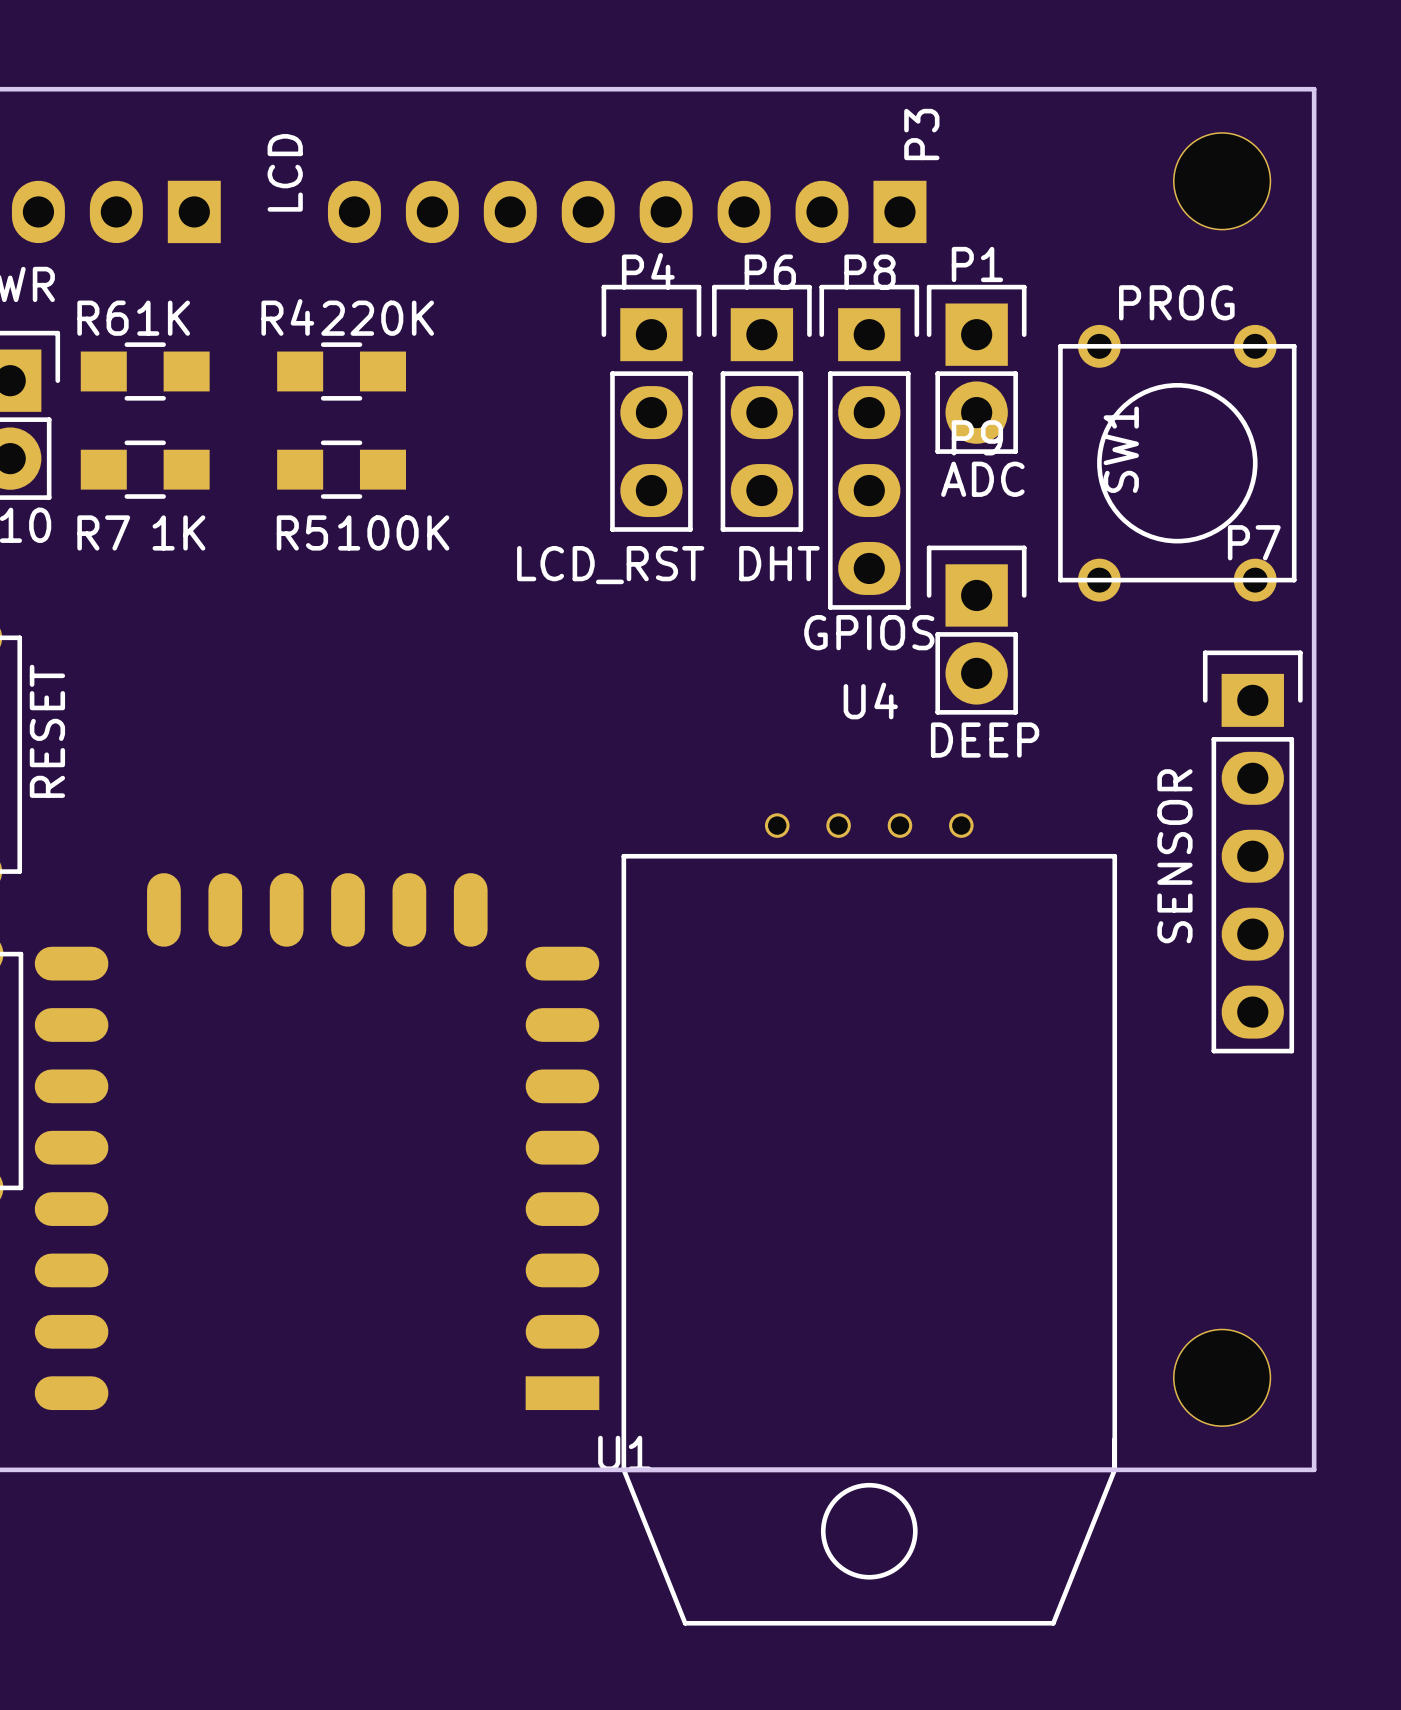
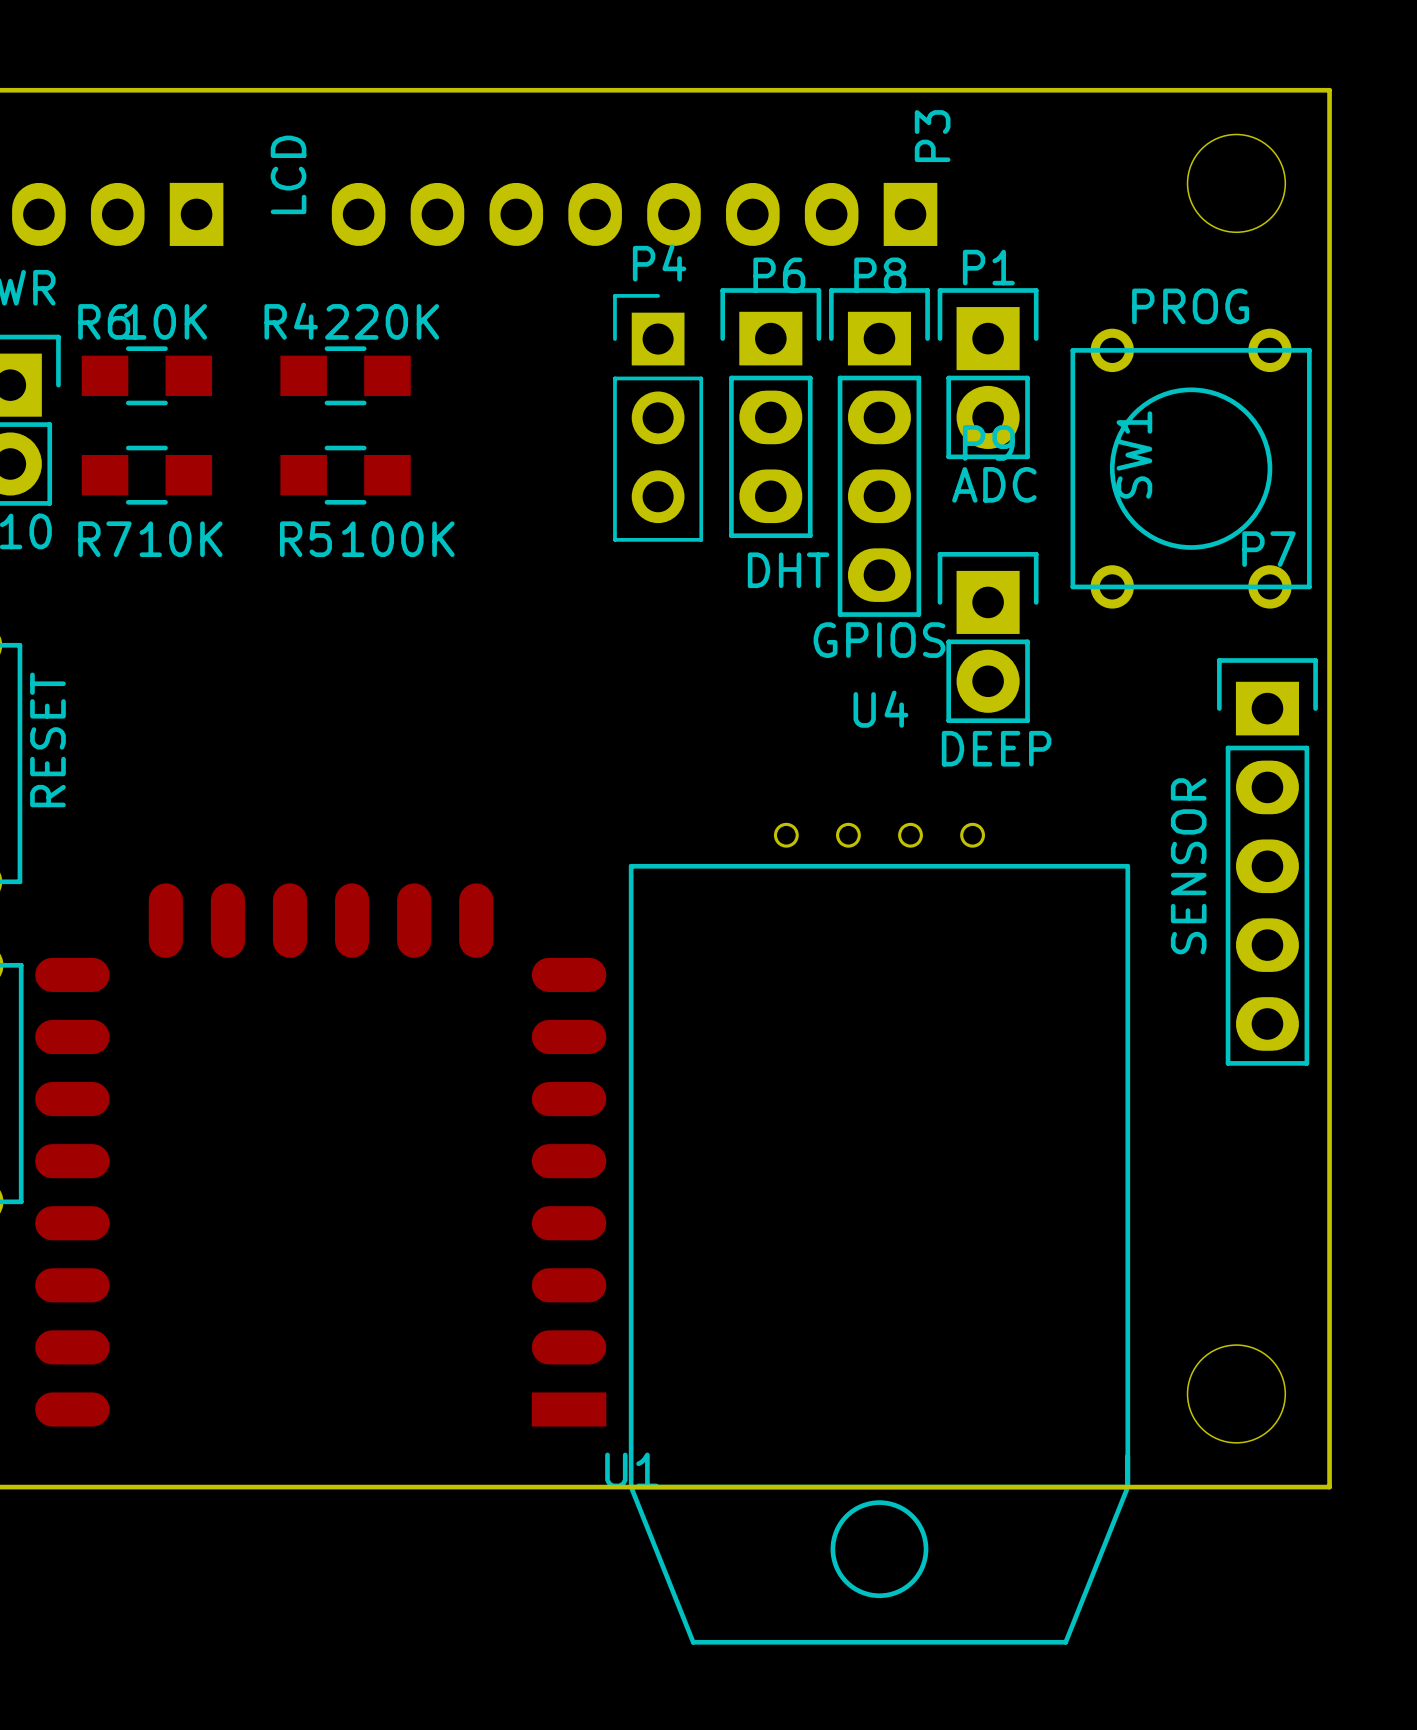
P4 footprint: [601, 284, 702, 532] -> [613, 294, 704, 542]
R6 value: 1K (163, 318) -> 10K (165, 321)
R7 value: 1K (178, 532) -> 10K (181, 539)
P4 value: LCD_RST (610, 565) -> none

